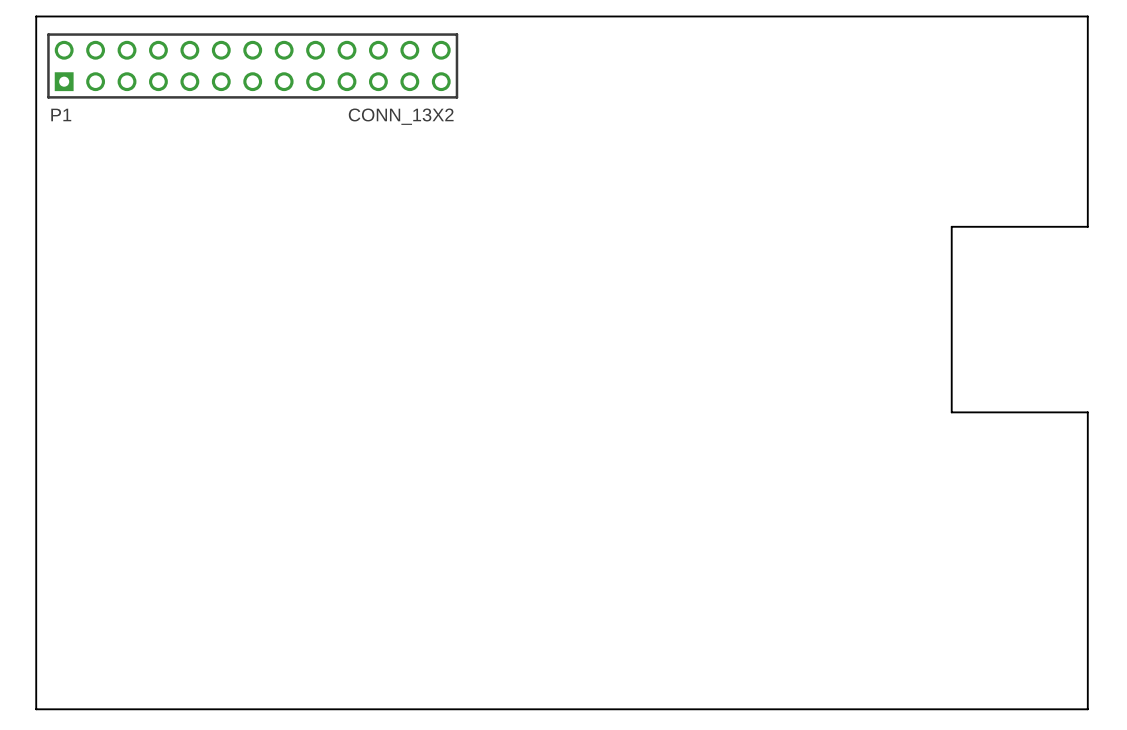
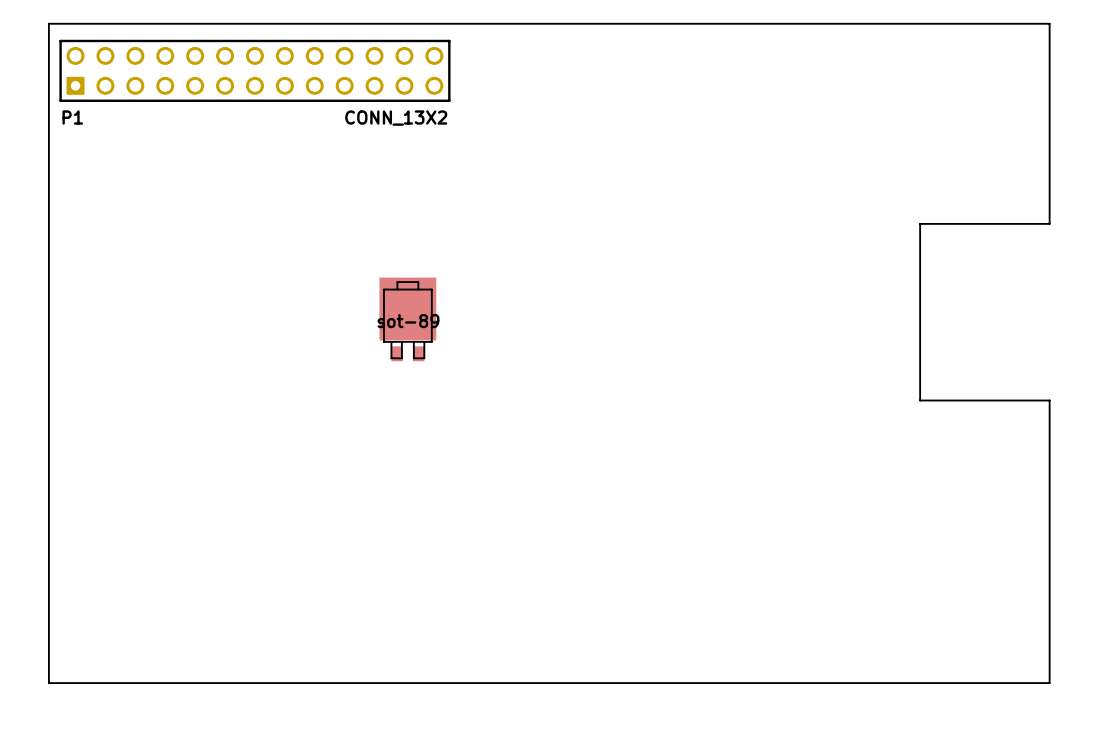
sot-89: none -> (407, 319)

